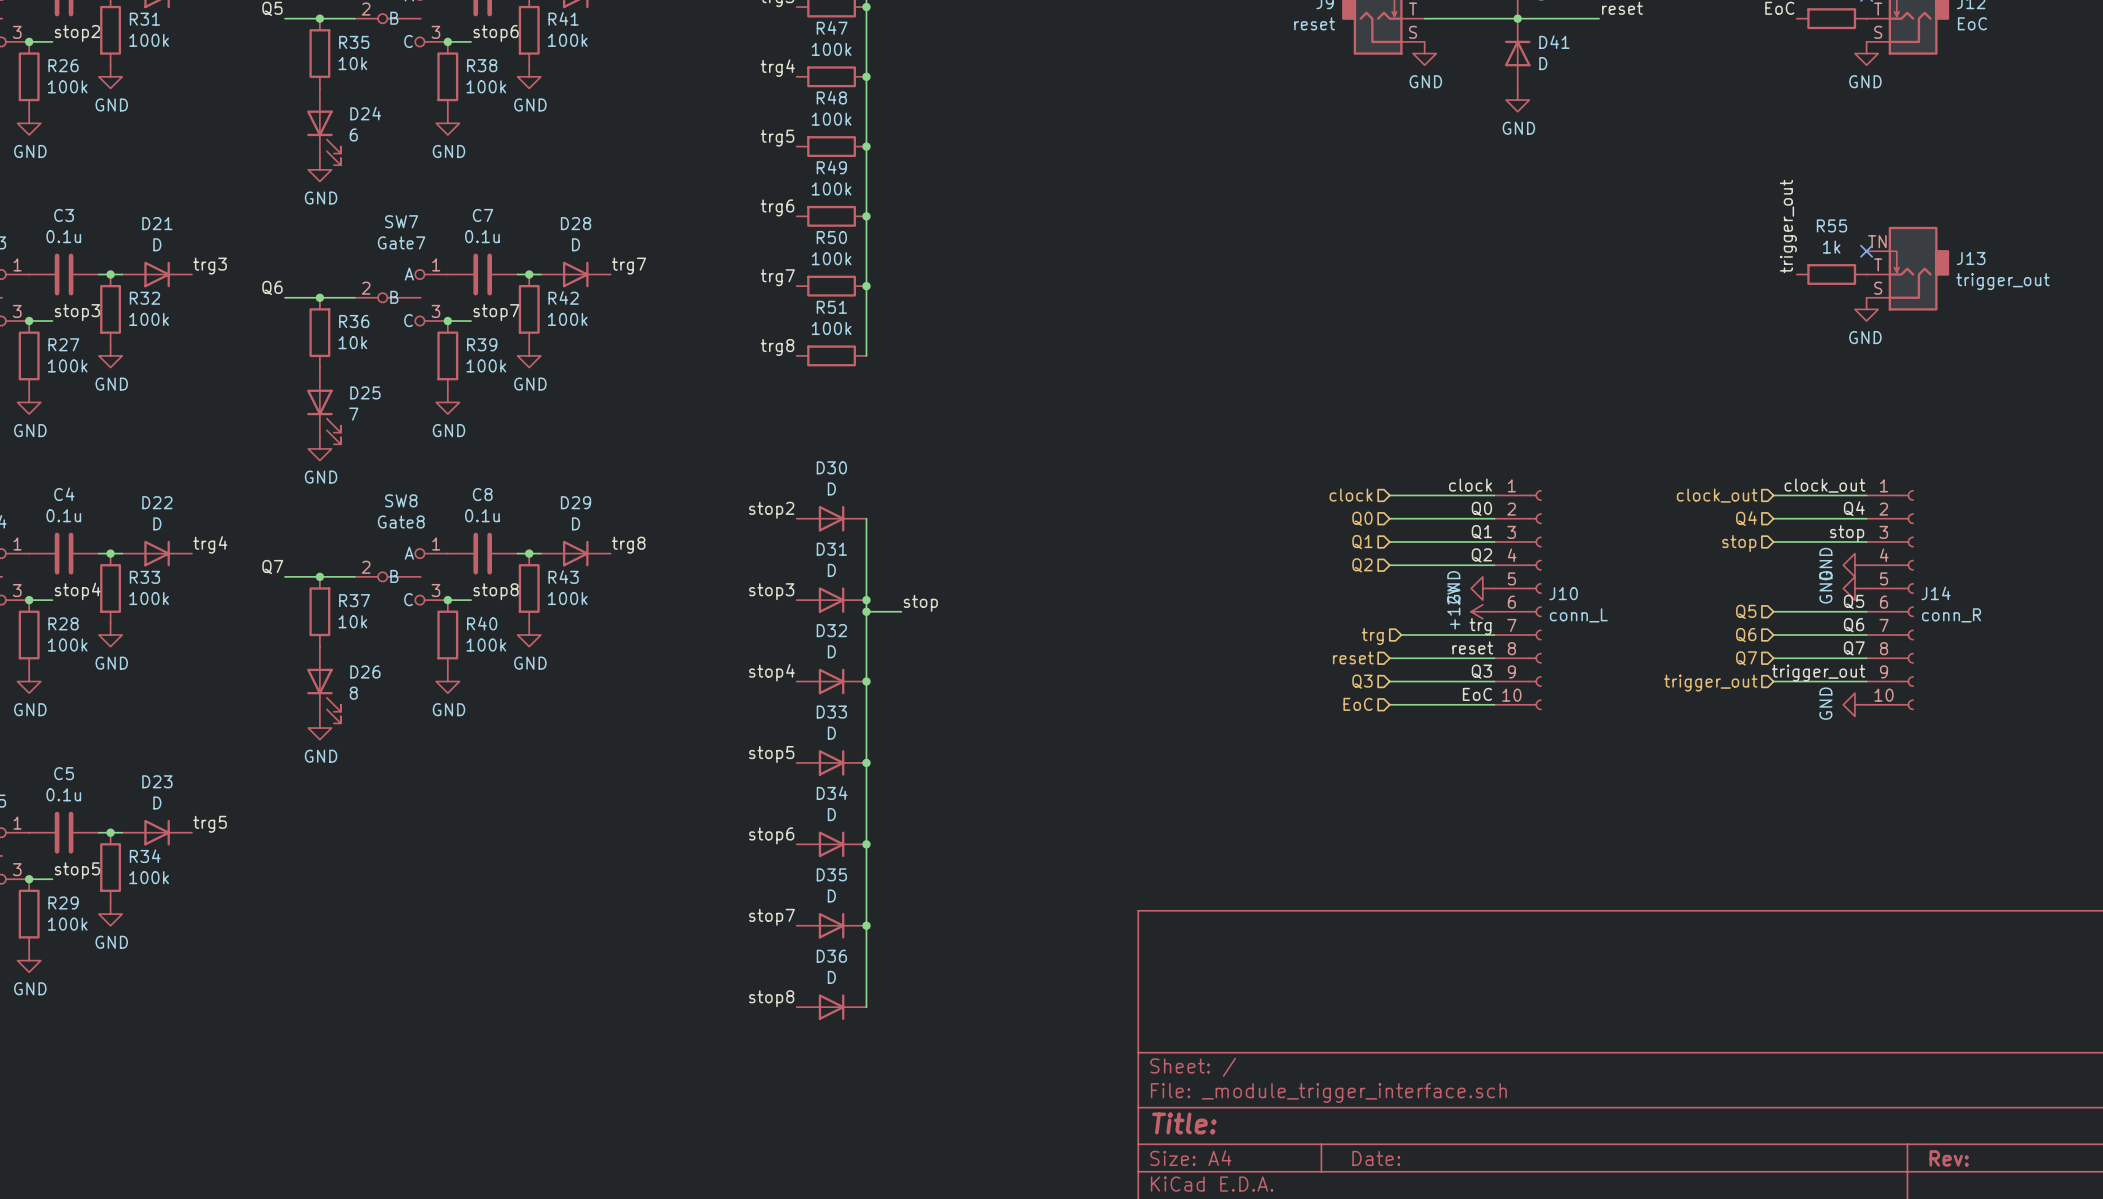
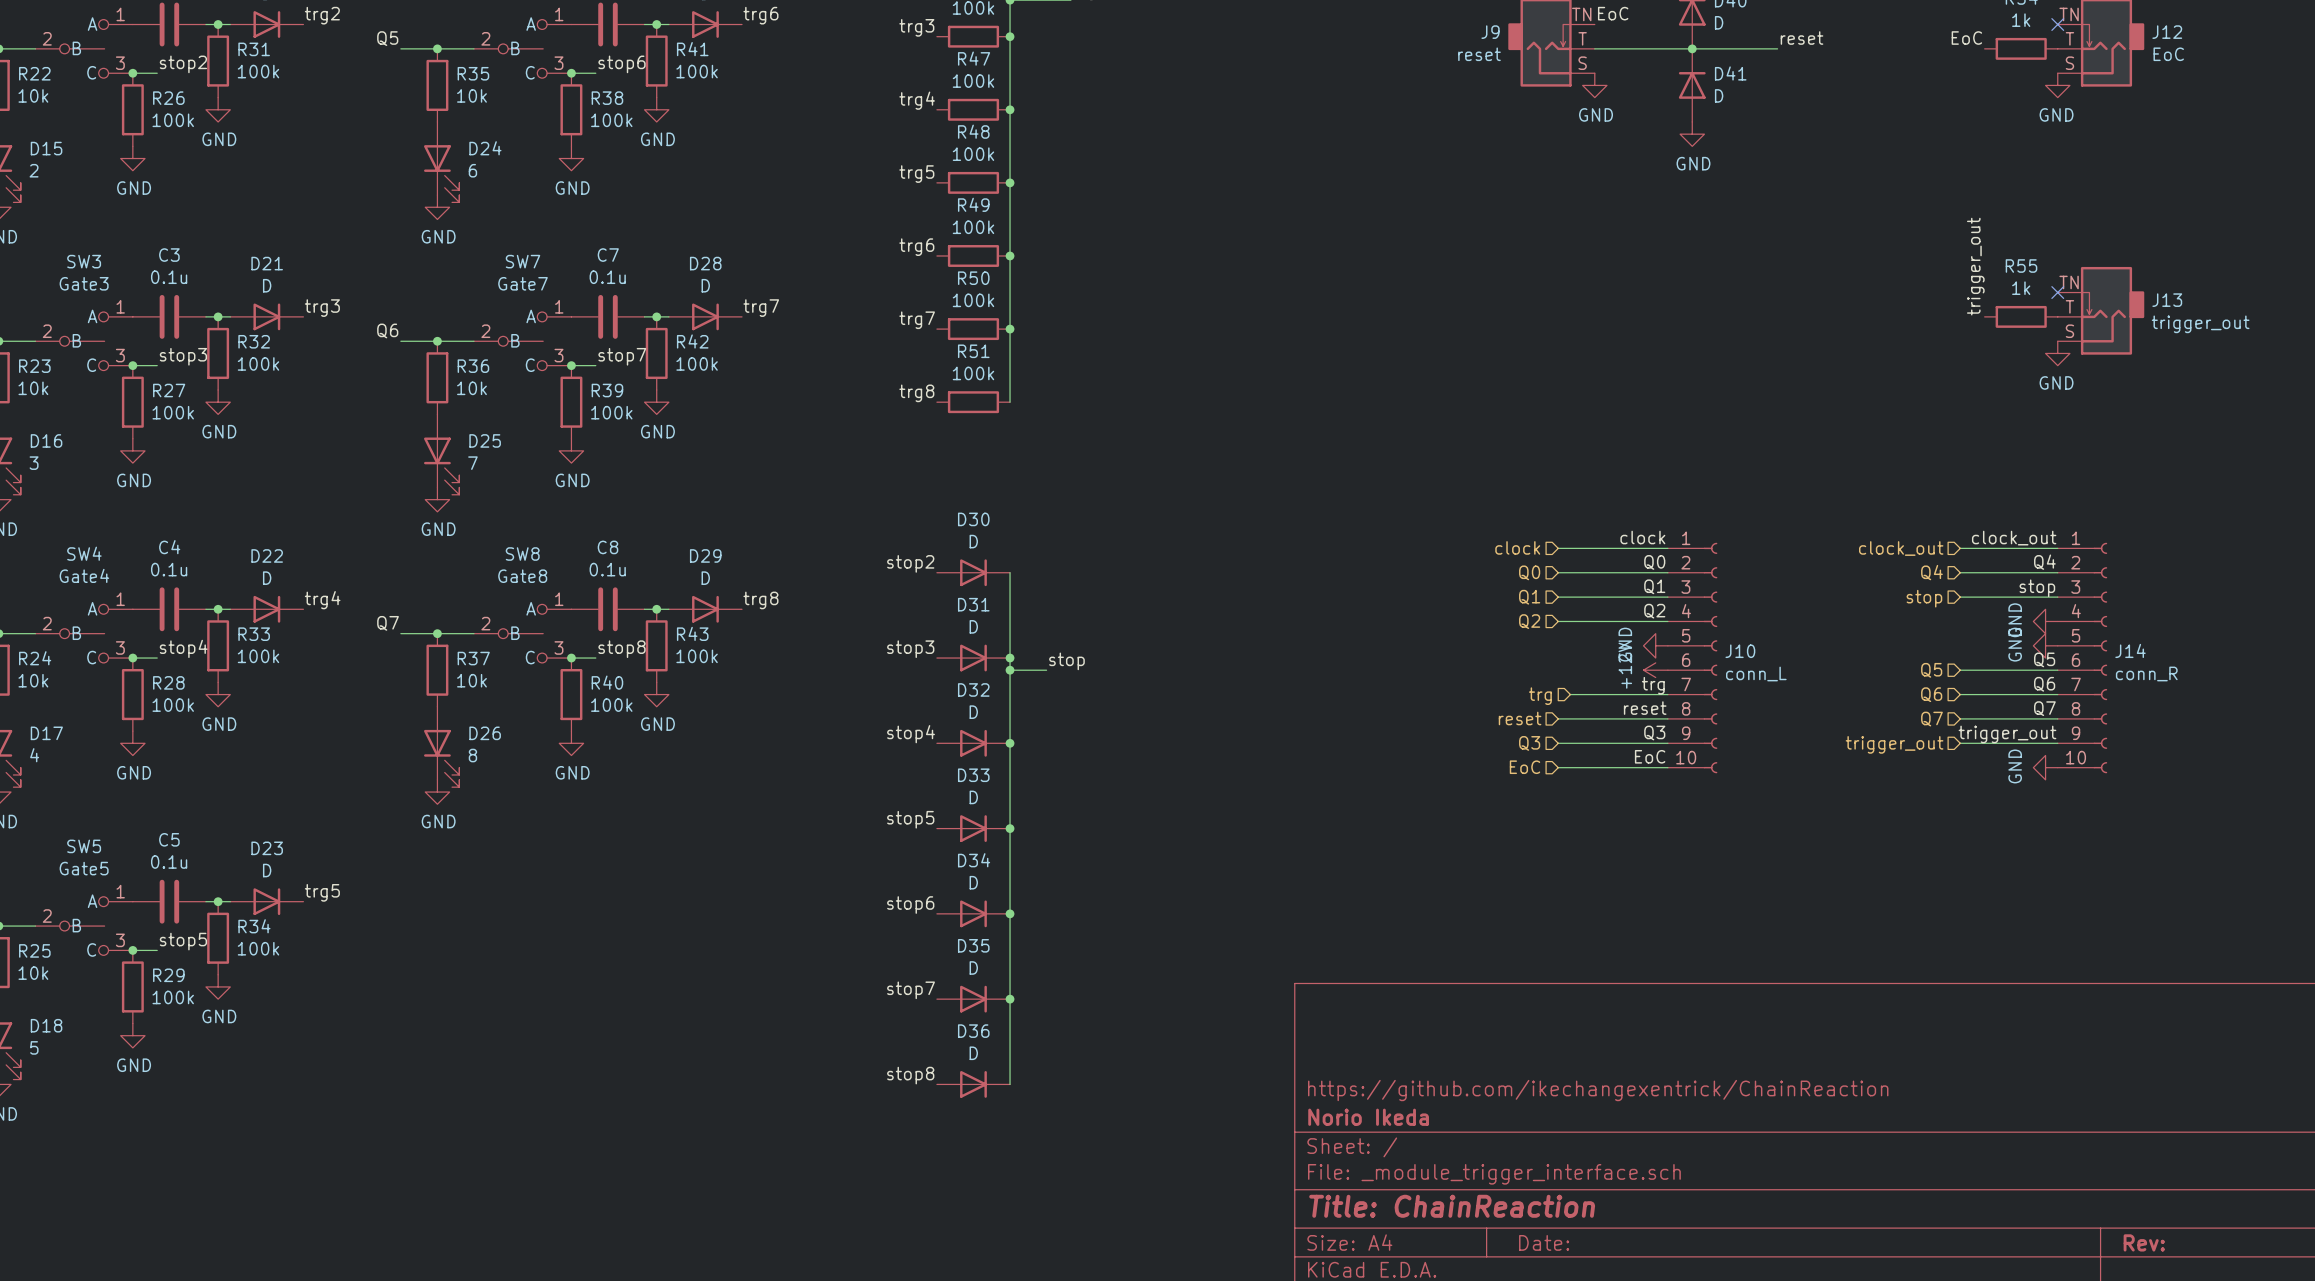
title block: none -> https://github.com/ikechangexentrick/ChainReaction (1598, 1090)
title block: none -> Norio Ikeda (1368, 1117)
title block: Title: (1184, 1123) -> Title: ChainReaction (1452, 1206)

